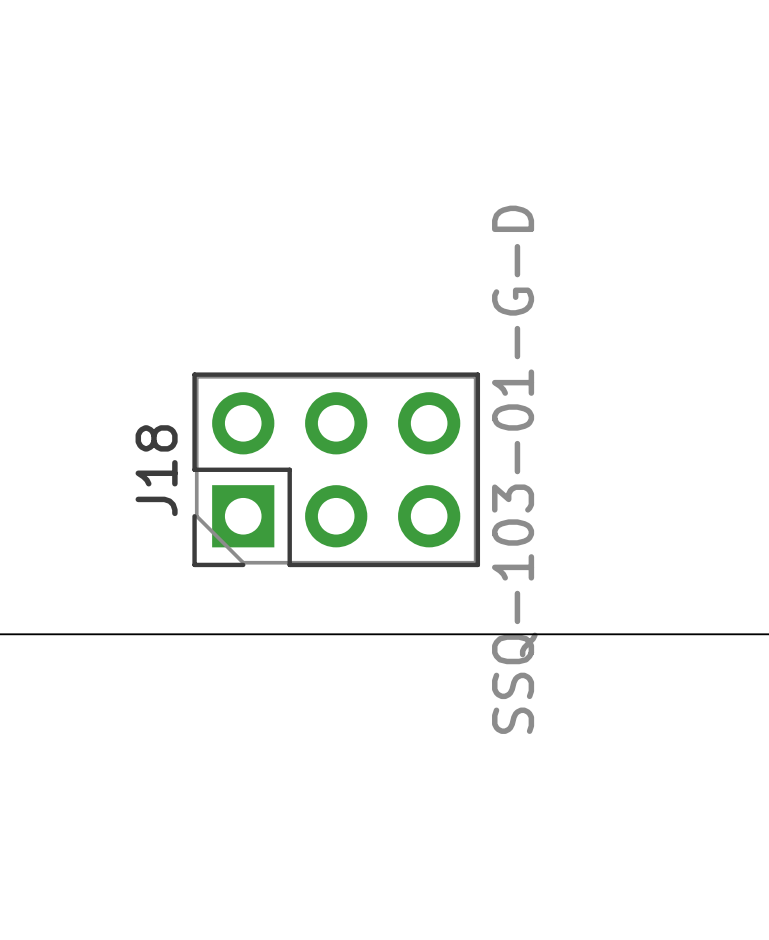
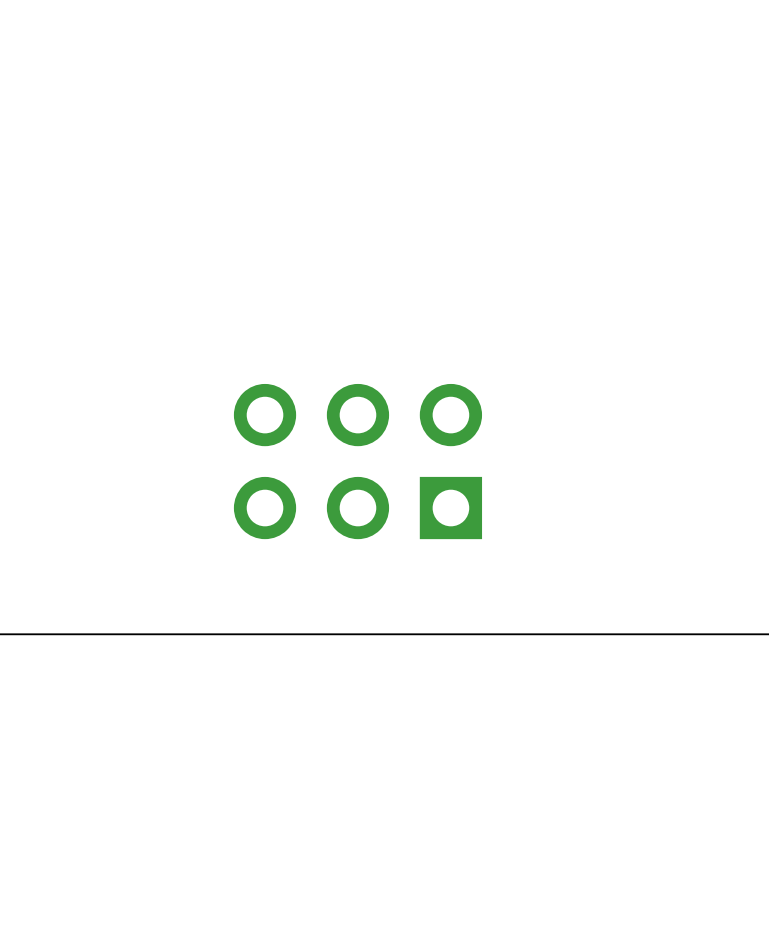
J18 side: top (336, 469) -> bottom (357, 461)

